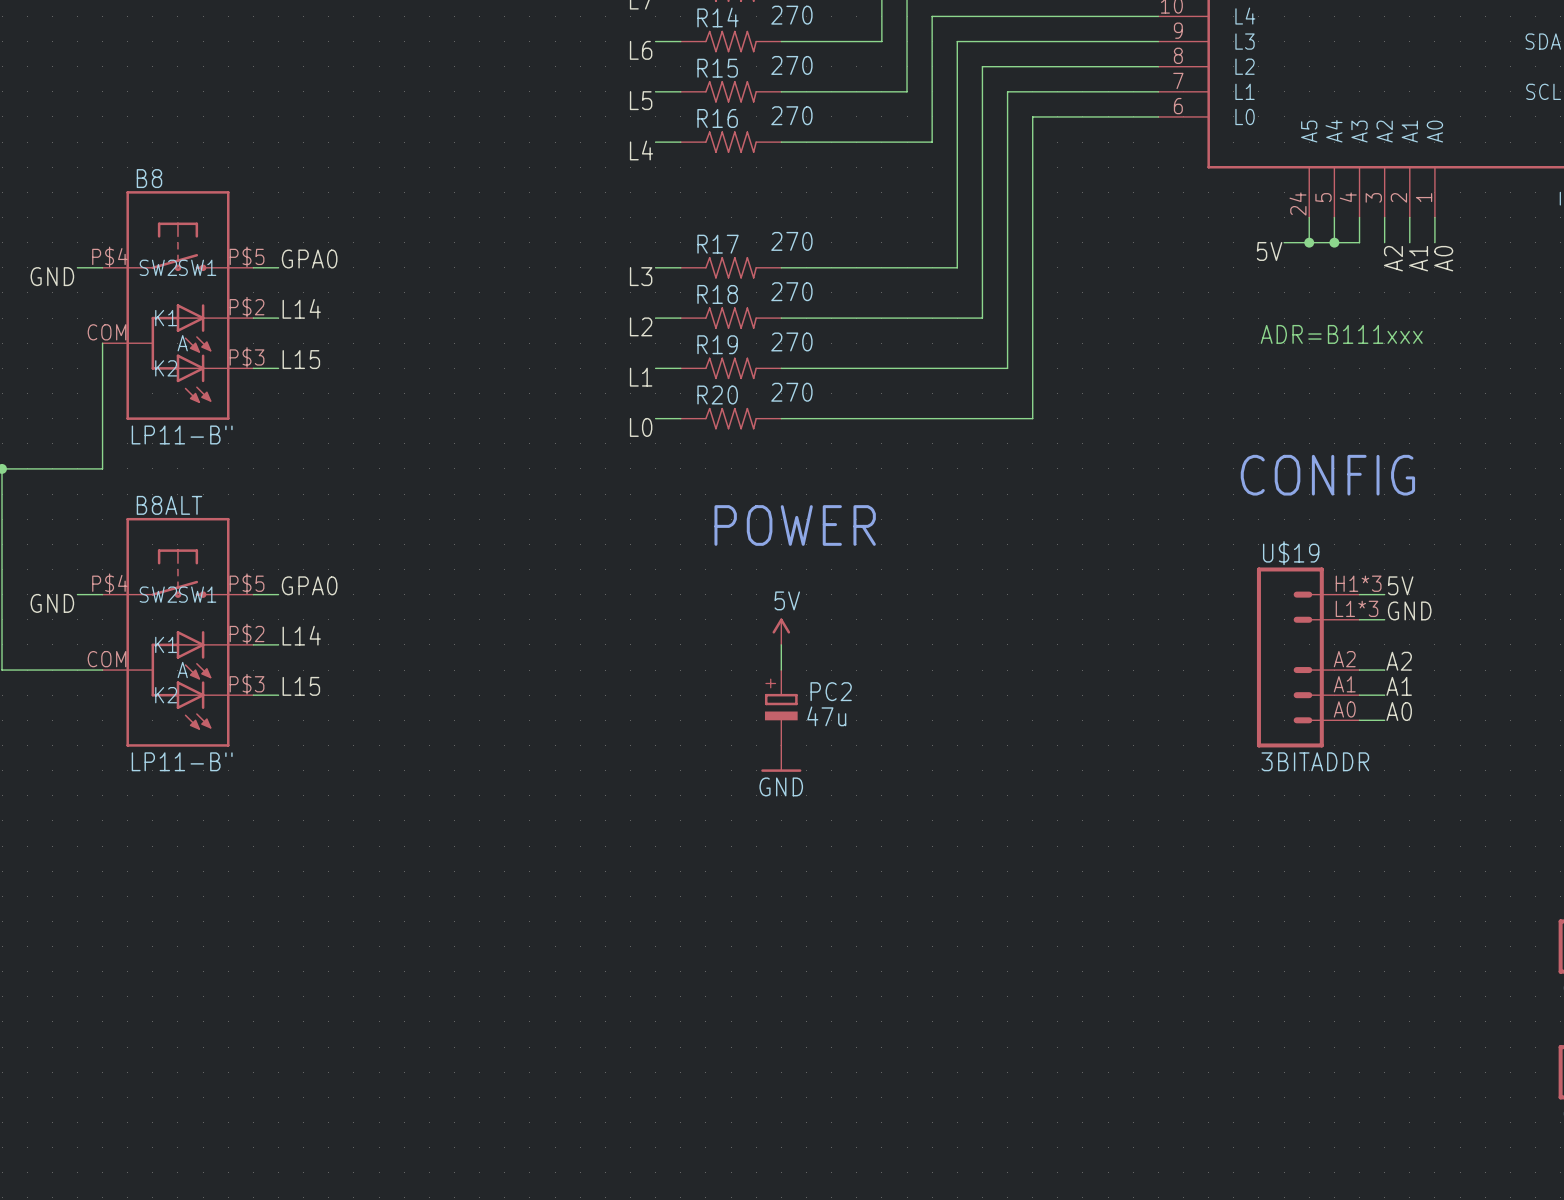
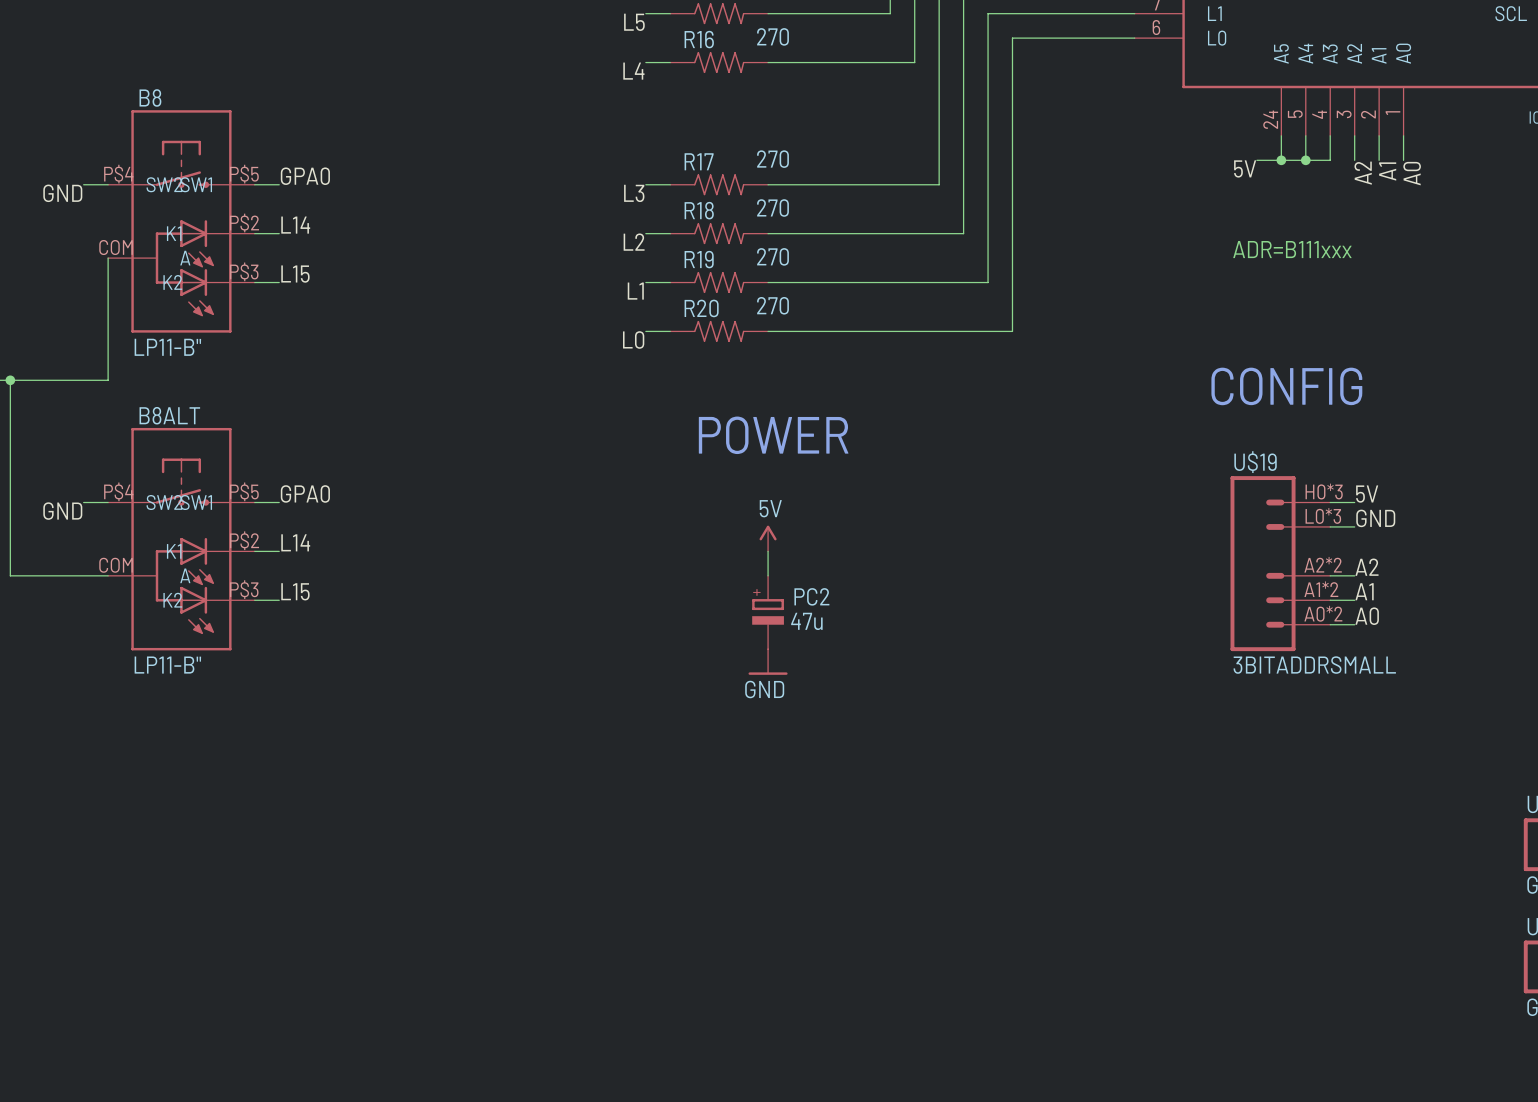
U$19 pin number: H1*3 (1358, 583) -> H0*3 (1324, 491)
U$19 pin number: L1*3 (1357, 608) -> L0*3 (1323, 515)
U$19 pin number: A2 (1344, 659) -> A2*2 (1323, 564)
U$19 pin number: A1 (1344, 684) -> A1*2 (1321, 589)
U$19 pin number: A0 (1344, 709) -> A0*2 (1323, 613)
U$19 value: 3BITADDR (1315, 761) -> 3BITADDRSMALL (1314, 665)

